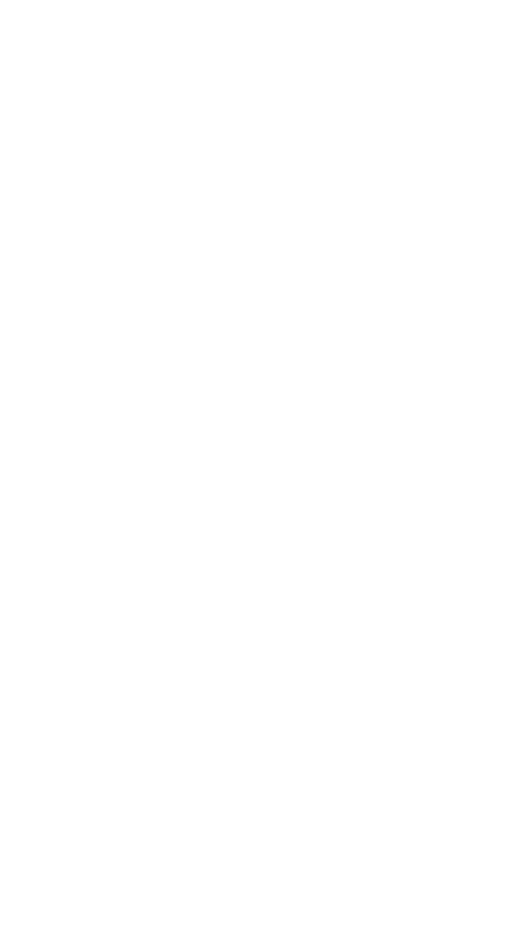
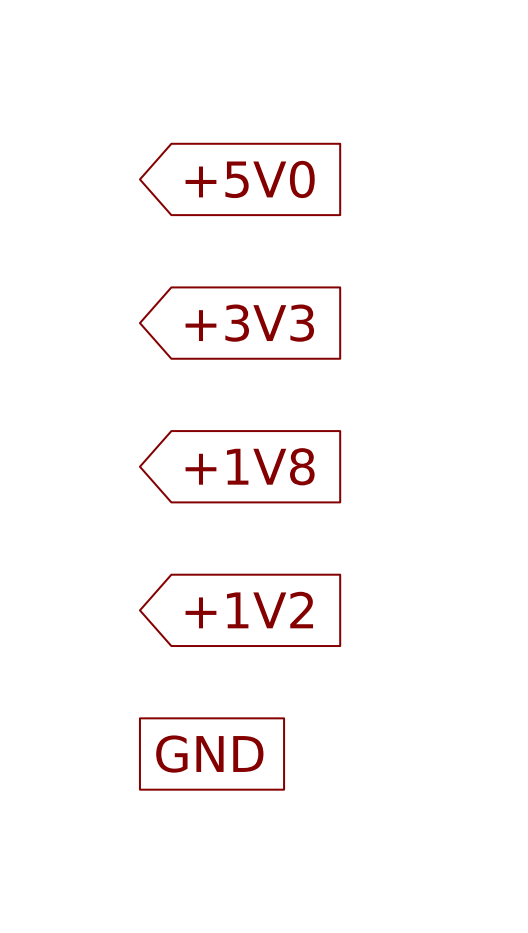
global label: none -> +5V0 (250, 179)
global label: none -> +3V3 (249, 323)
global label: none -> +1V8 (250, 466)
global label: none -> +1V2 (249, 610)
global label: none -> GND (209, 754)

